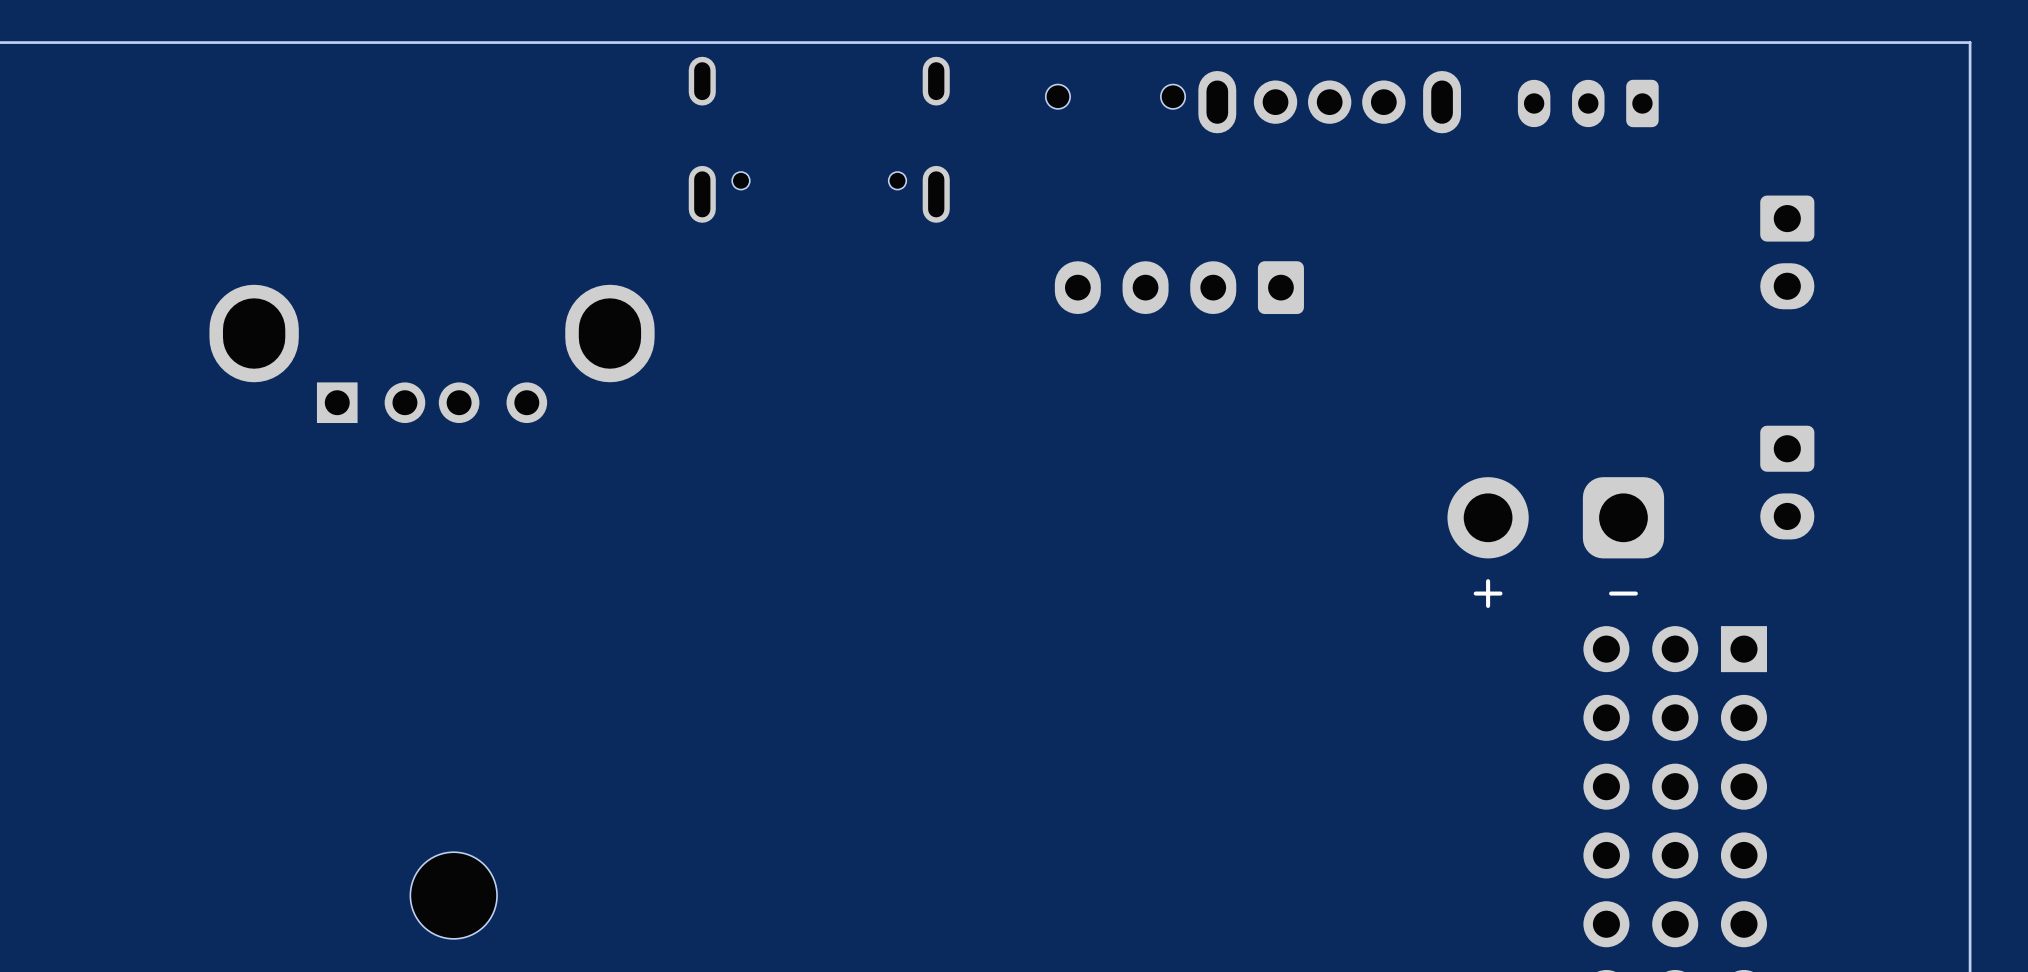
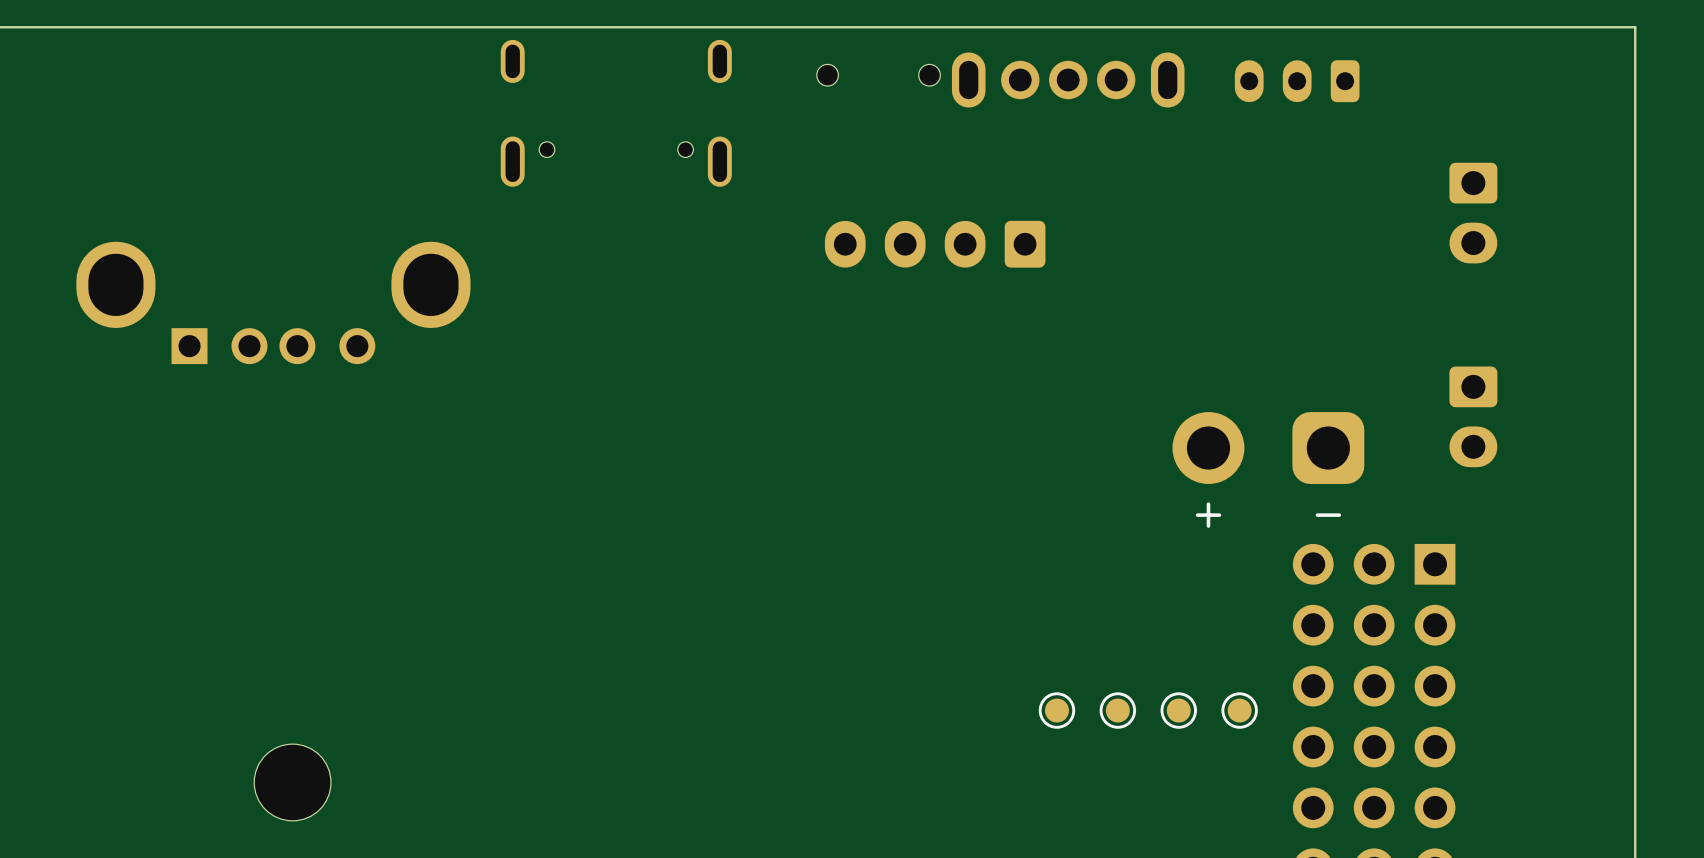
part: none -> (1056, 710)
part: none -> (1117, 710)
part: none -> (1178, 710)
part: none -> (1239, 710)

